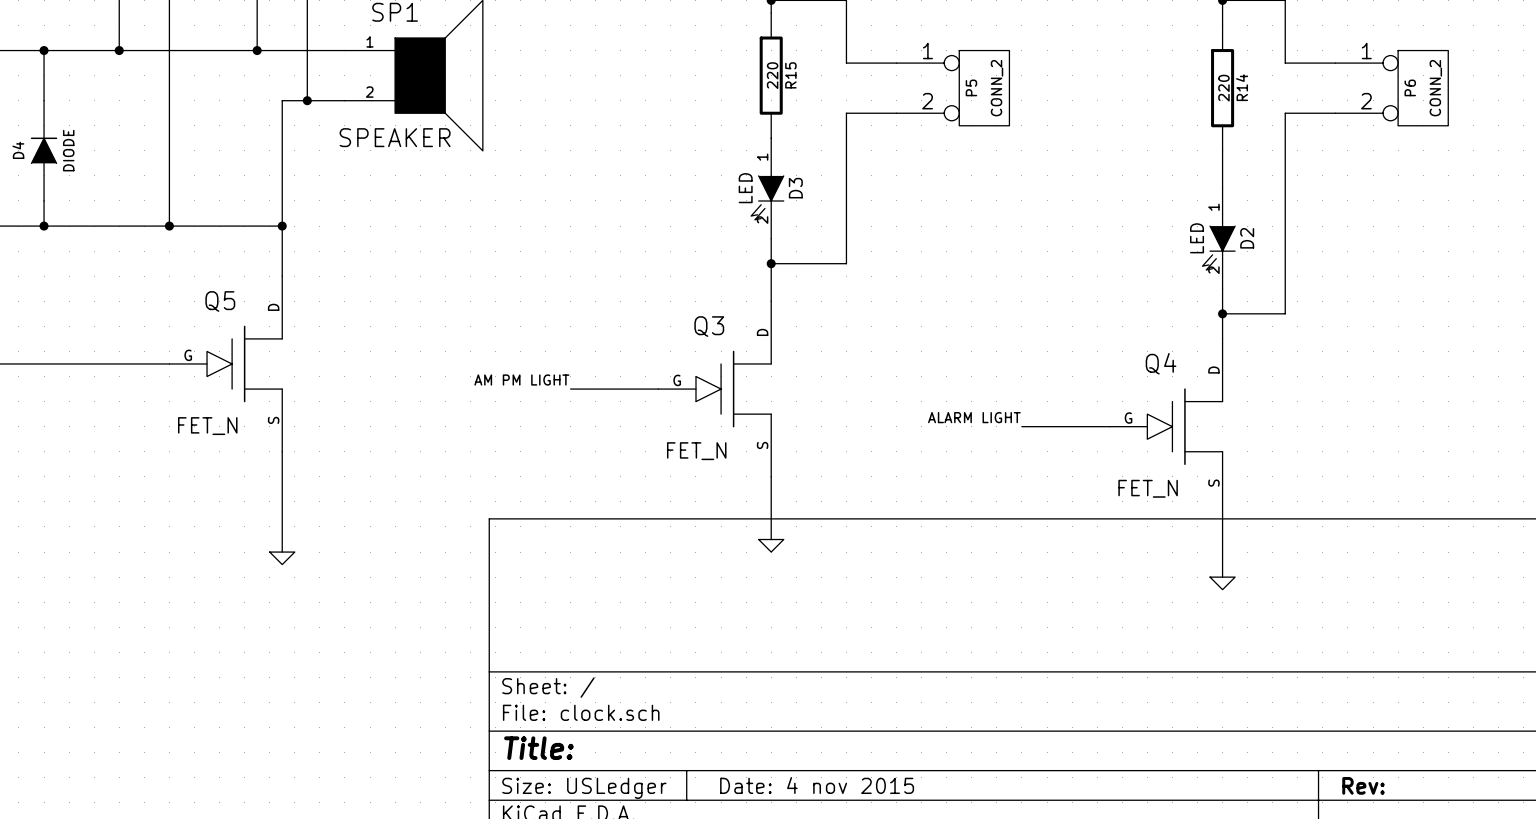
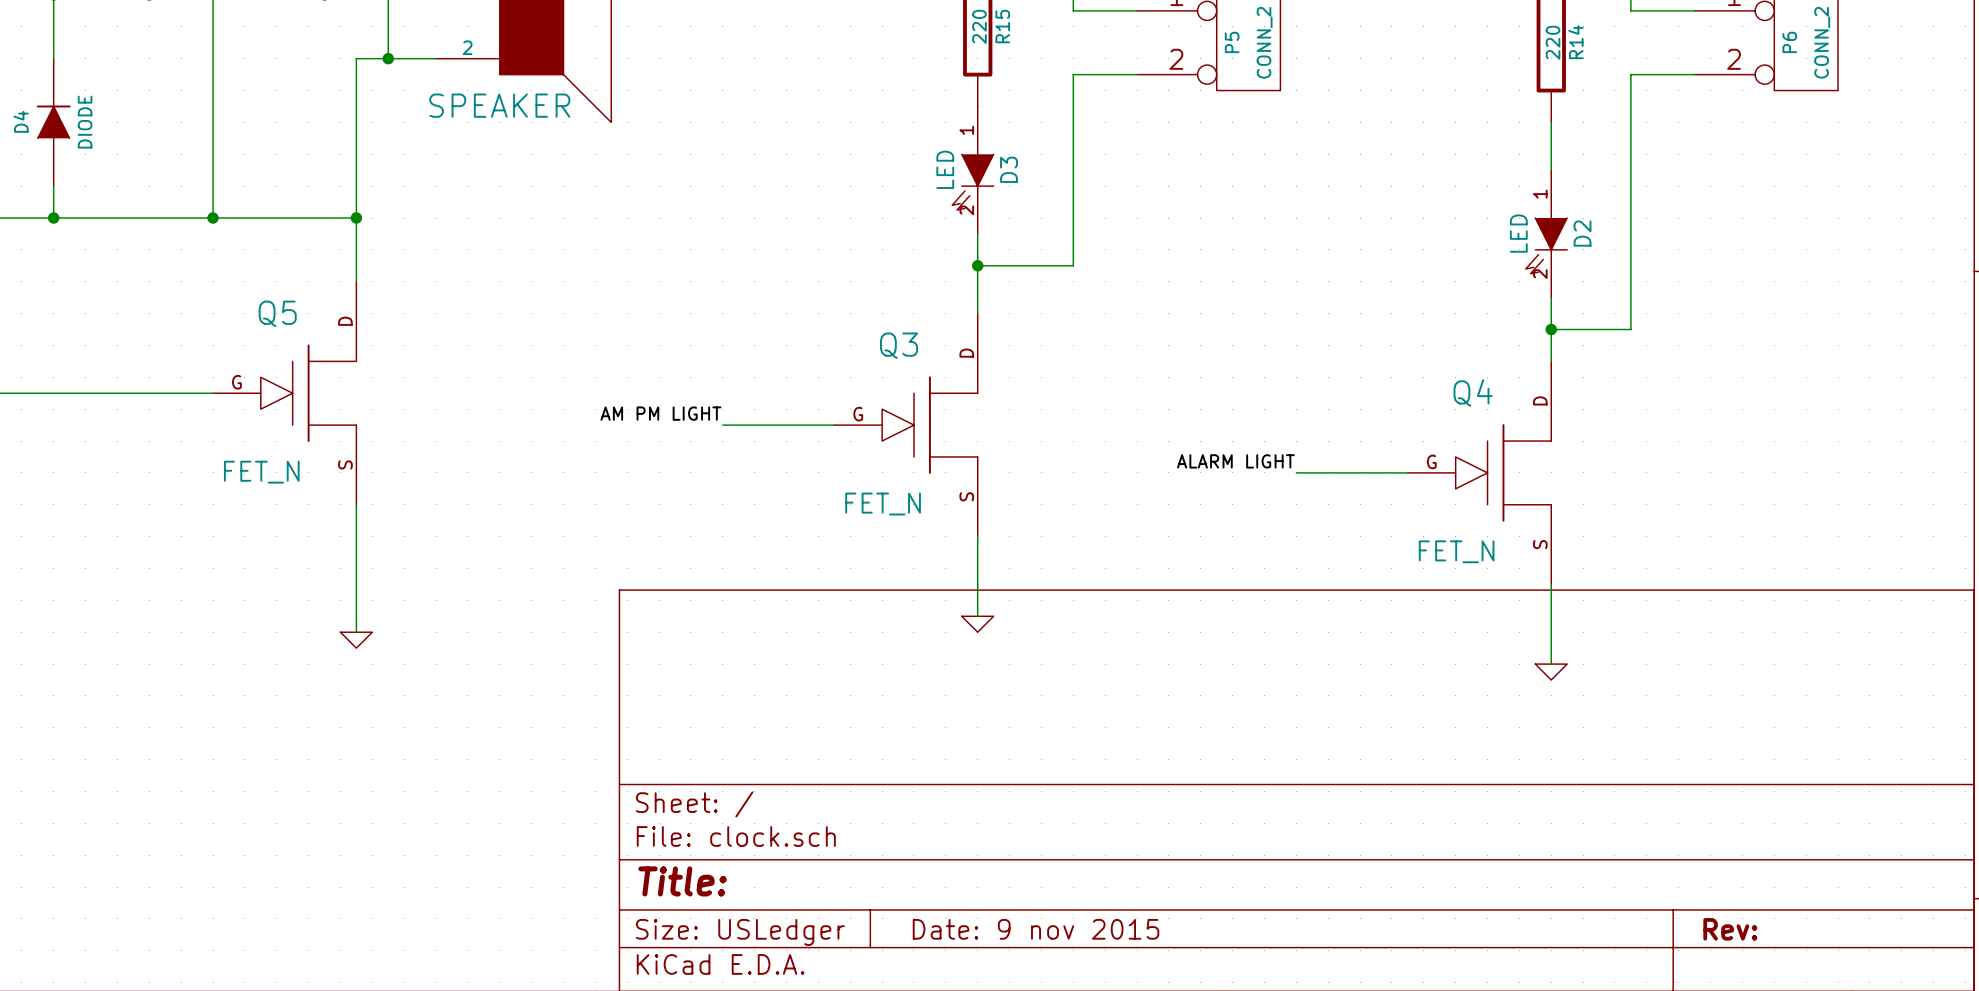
title block: Date: 4 nov 2015 (817, 785) -> Date: 9 nov 2015 (1036, 929)

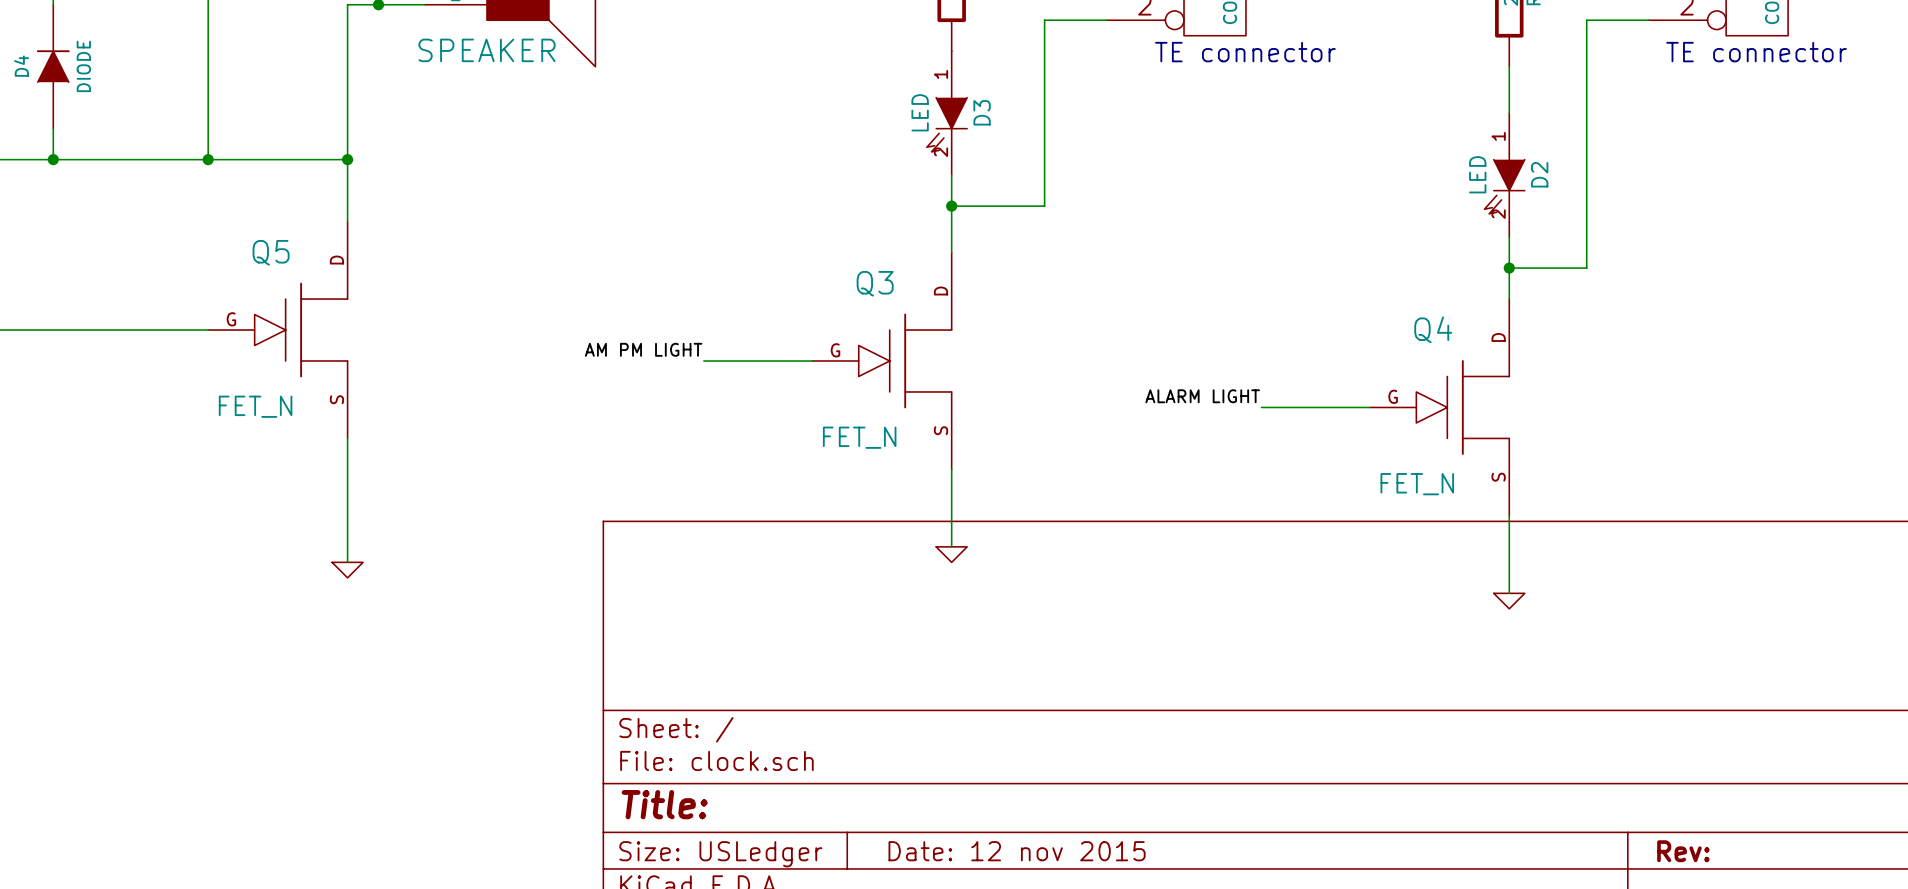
text: none -> TE connector (1245, 52)
text: none -> TE connector (1756, 52)
title block: Date: 9 nov 2015 (1036, 929) -> Date: 12 nov 2015 (1017, 851)

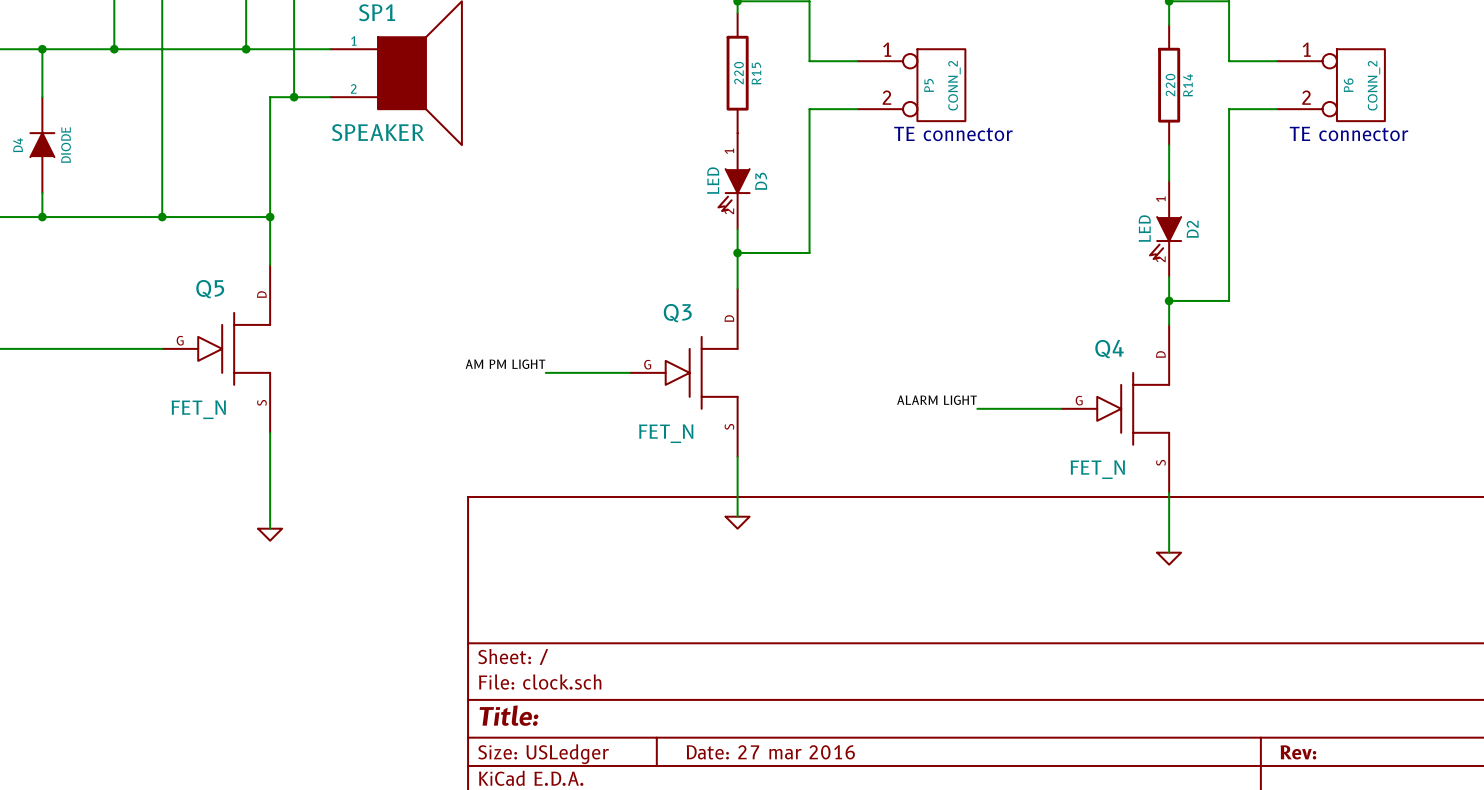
title block: Date: 12 nov 2015 (1017, 851) -> Date: 27 mar 2016 (770, 752)

